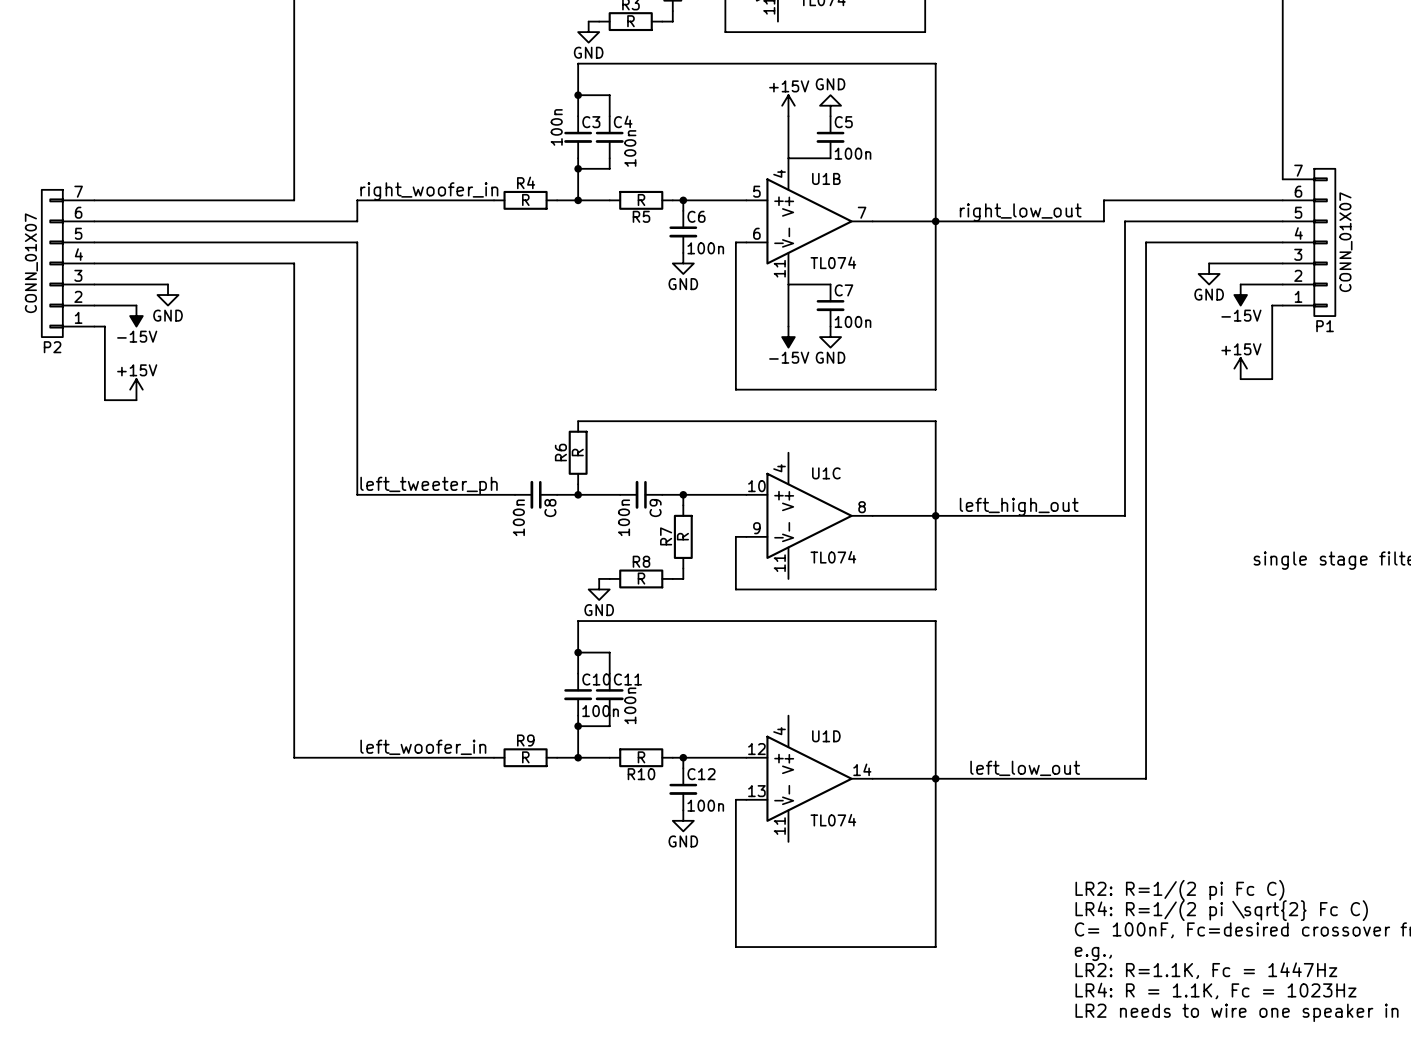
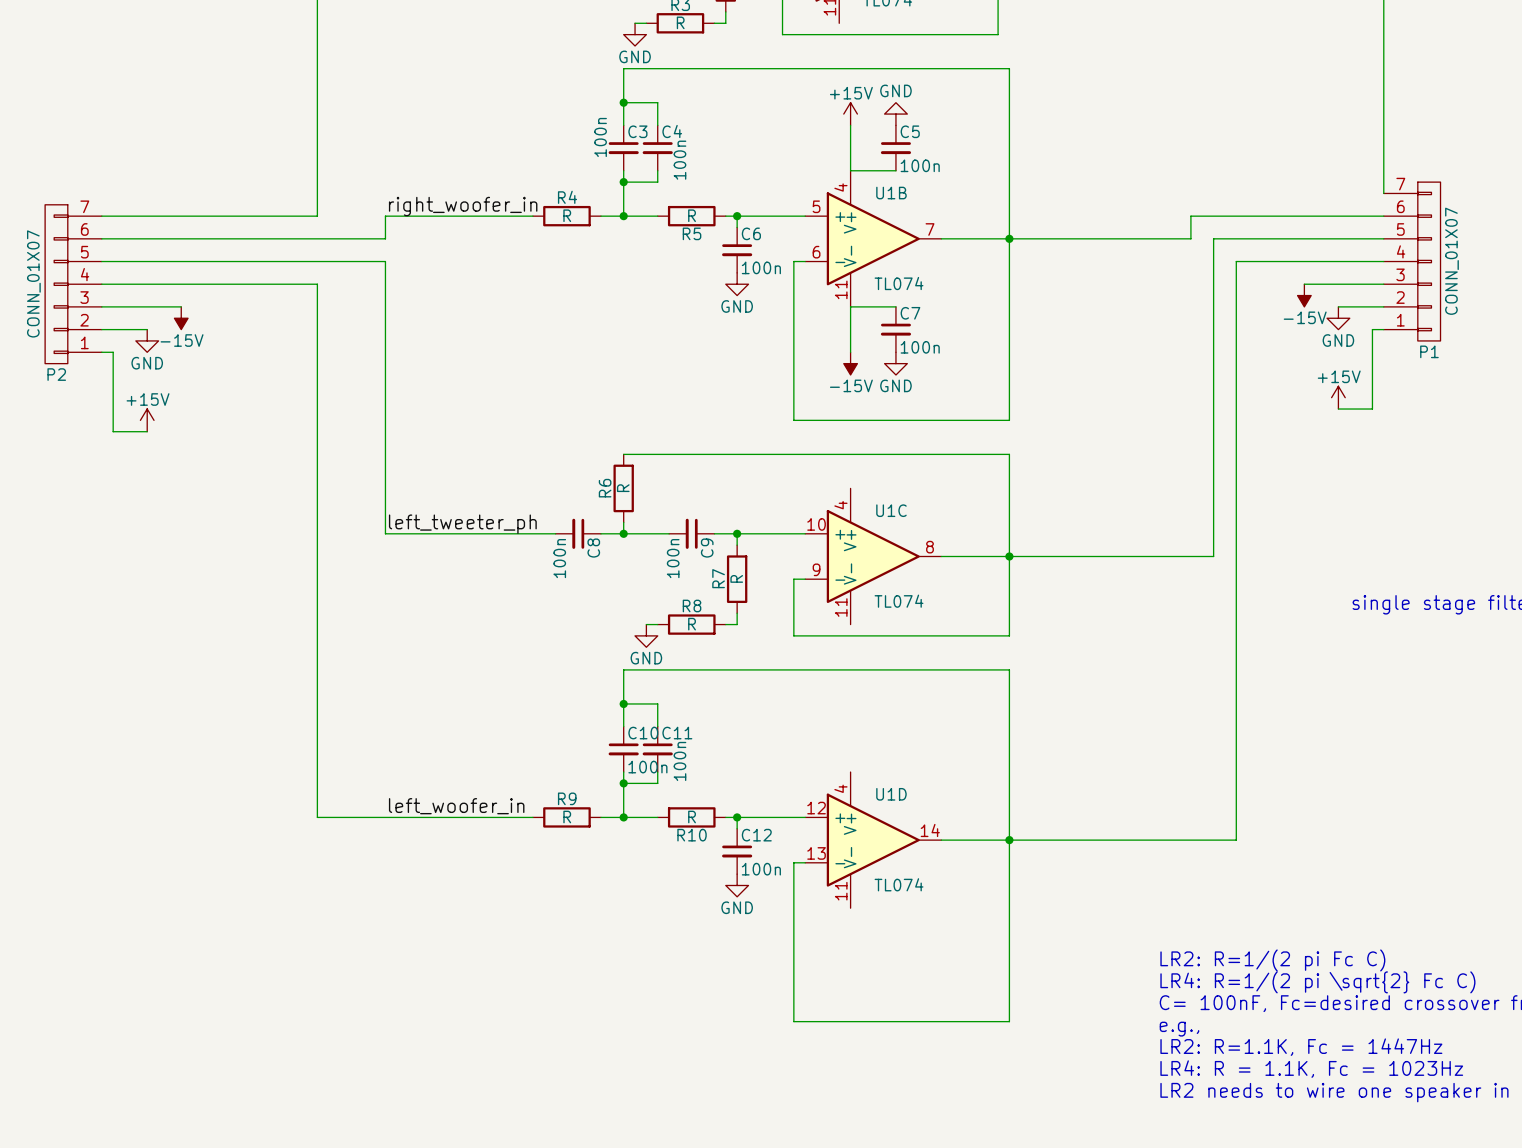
label: right_low_out (1020, 212) -> none
power symbol: GND (1209, 273) -> -15V (1304, 295)
power symbol: GND (168, 295) -> -15V (181, 318)
power symbol: -15V (1240, 295) -> GND (1338, 318)
power symbol: -15V (136, 316) -> GND (147, 340)
label: left_high_out (1019, 506) -> none
label: left_low_out (1025, 768) -> none

